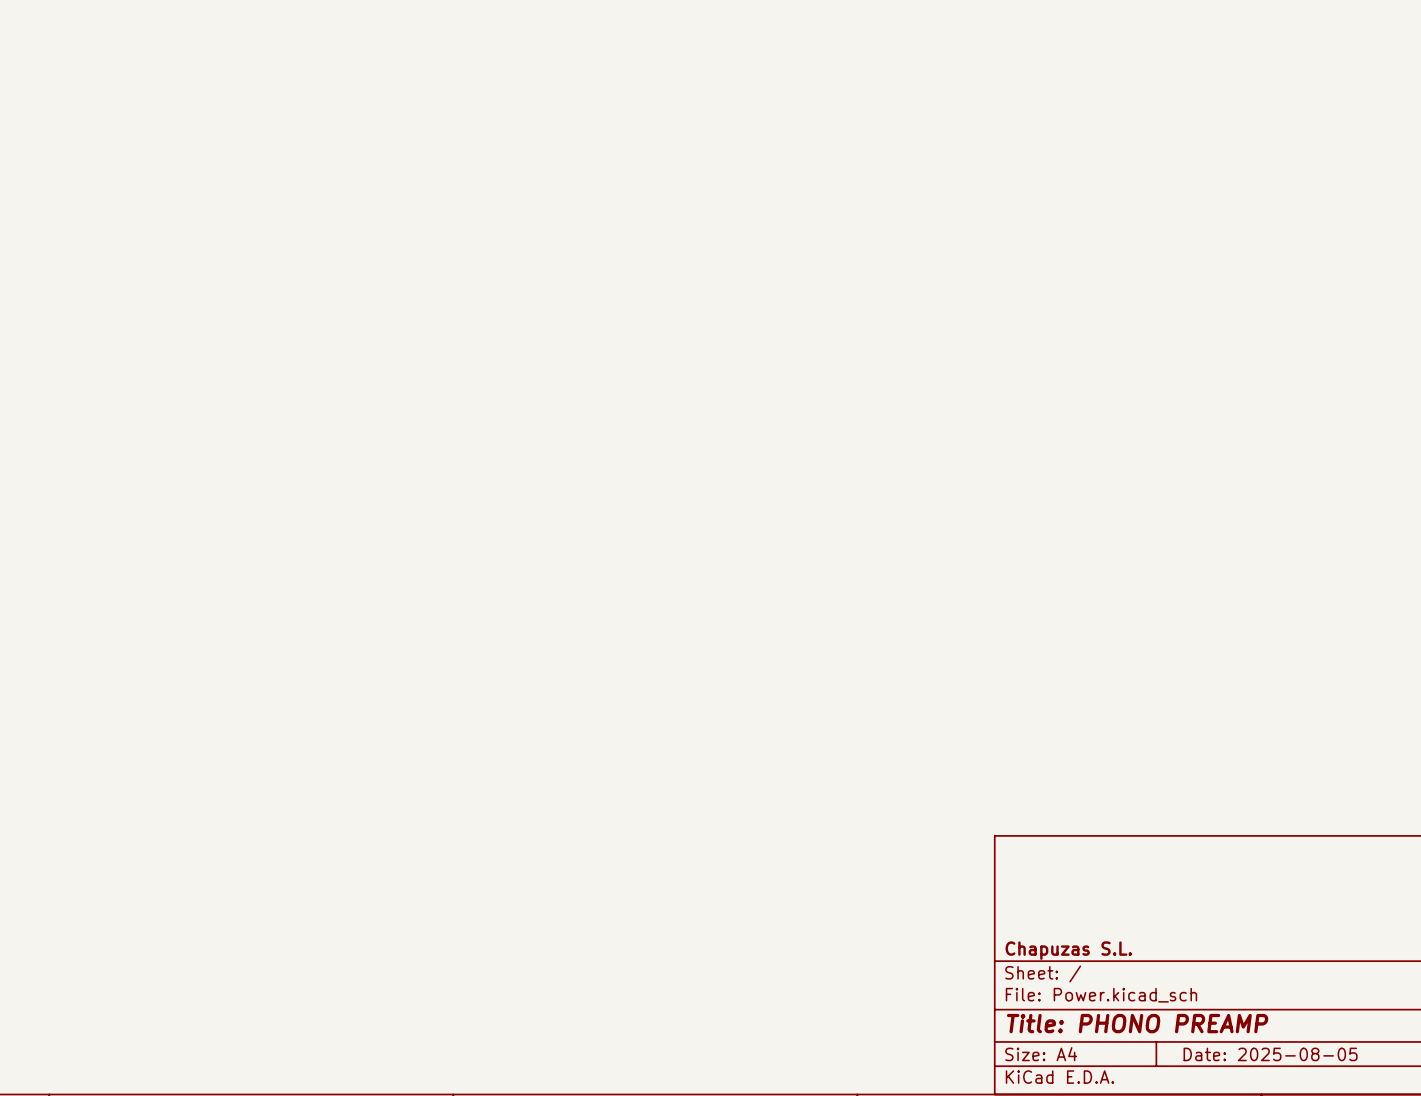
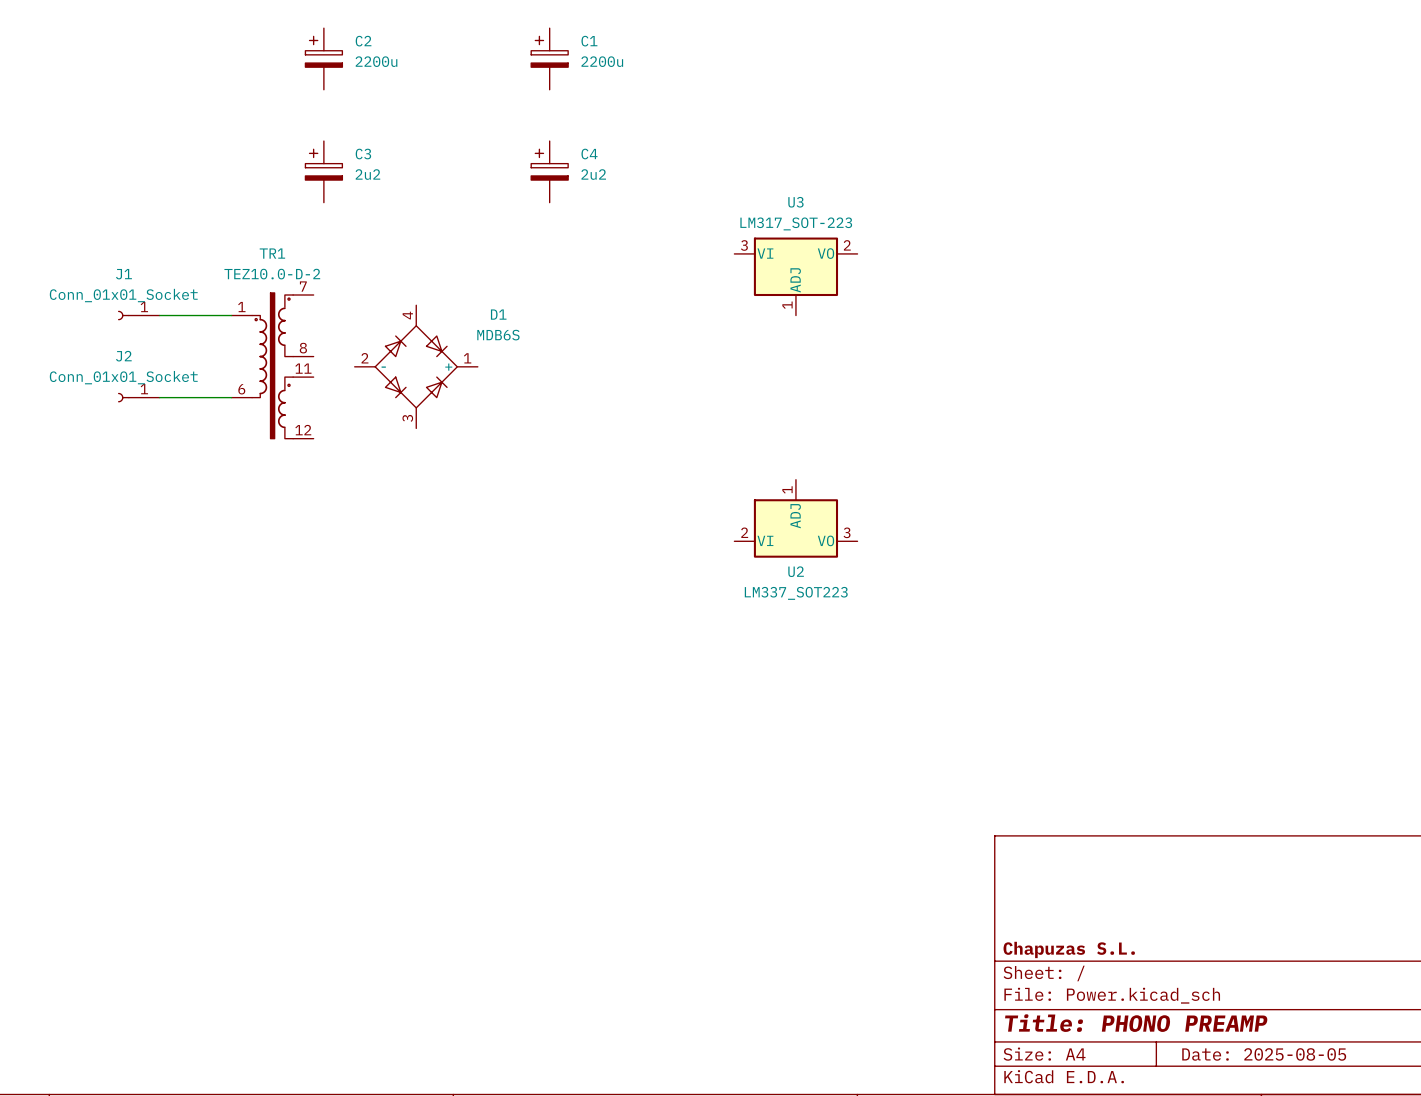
C2: none -> 2200u (323, 58)
C1: none -> 2200u (549, 58)
C3: none -> 2u2 (323, 171)
C4: none -> 2u2 (549, 171)
U3: none -> LM317_SOT-223 (795, 276)
J1: none -> Conn_01x01_Socket (138, 315)
wire: none -> (159, 315) (231, 315)
TR1: none -> TEZ10.0-D-2 (272, 365)
D1: none -> MDB6S (416, 366)
J2: none -> Conn_01x01_Socket (138, 397)
wire: none -> (159, 397) (231, 397)
U2: none -> LM337_SOT223 (795, 518)

